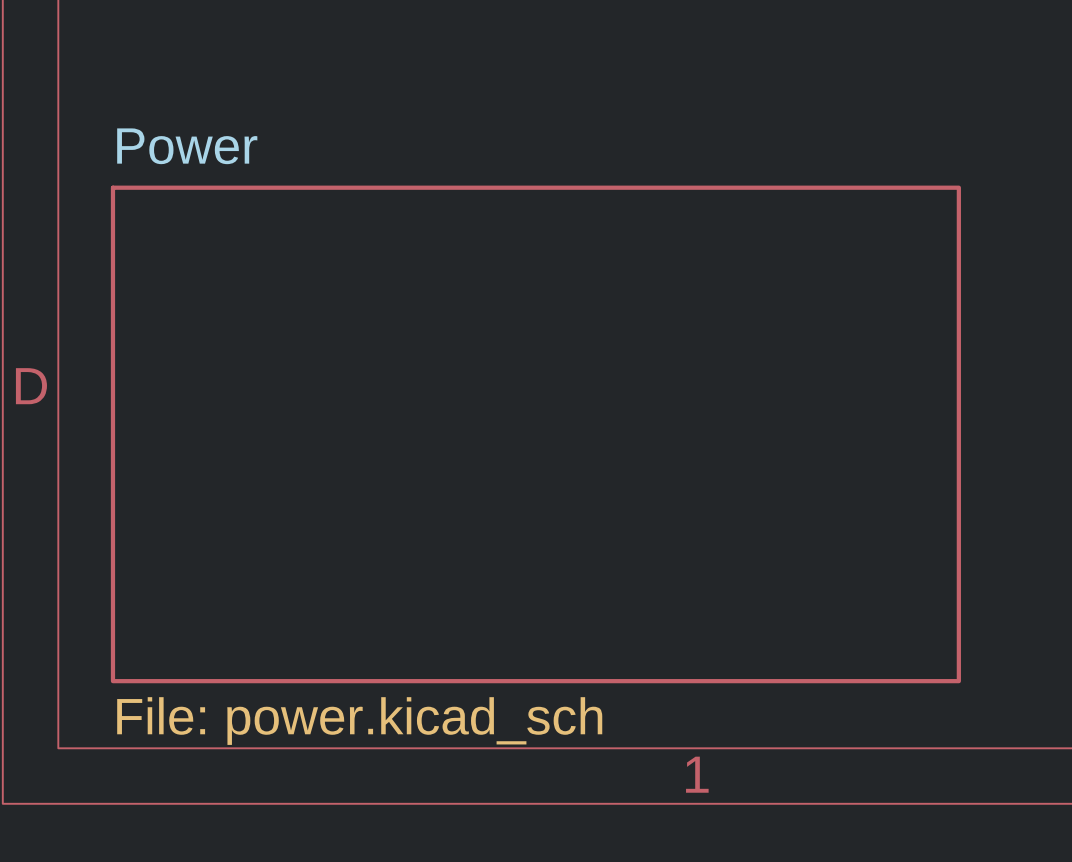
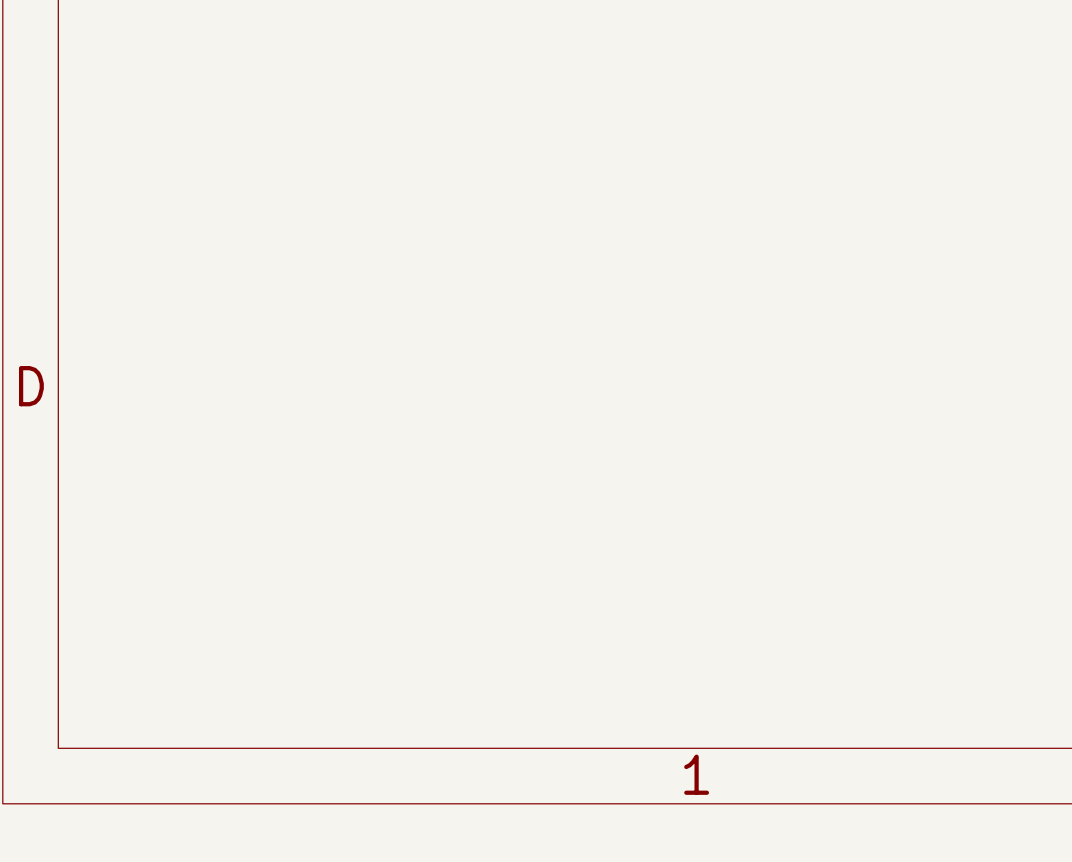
sheet Power: File: power.kicad_sch (535, 434) -> none

